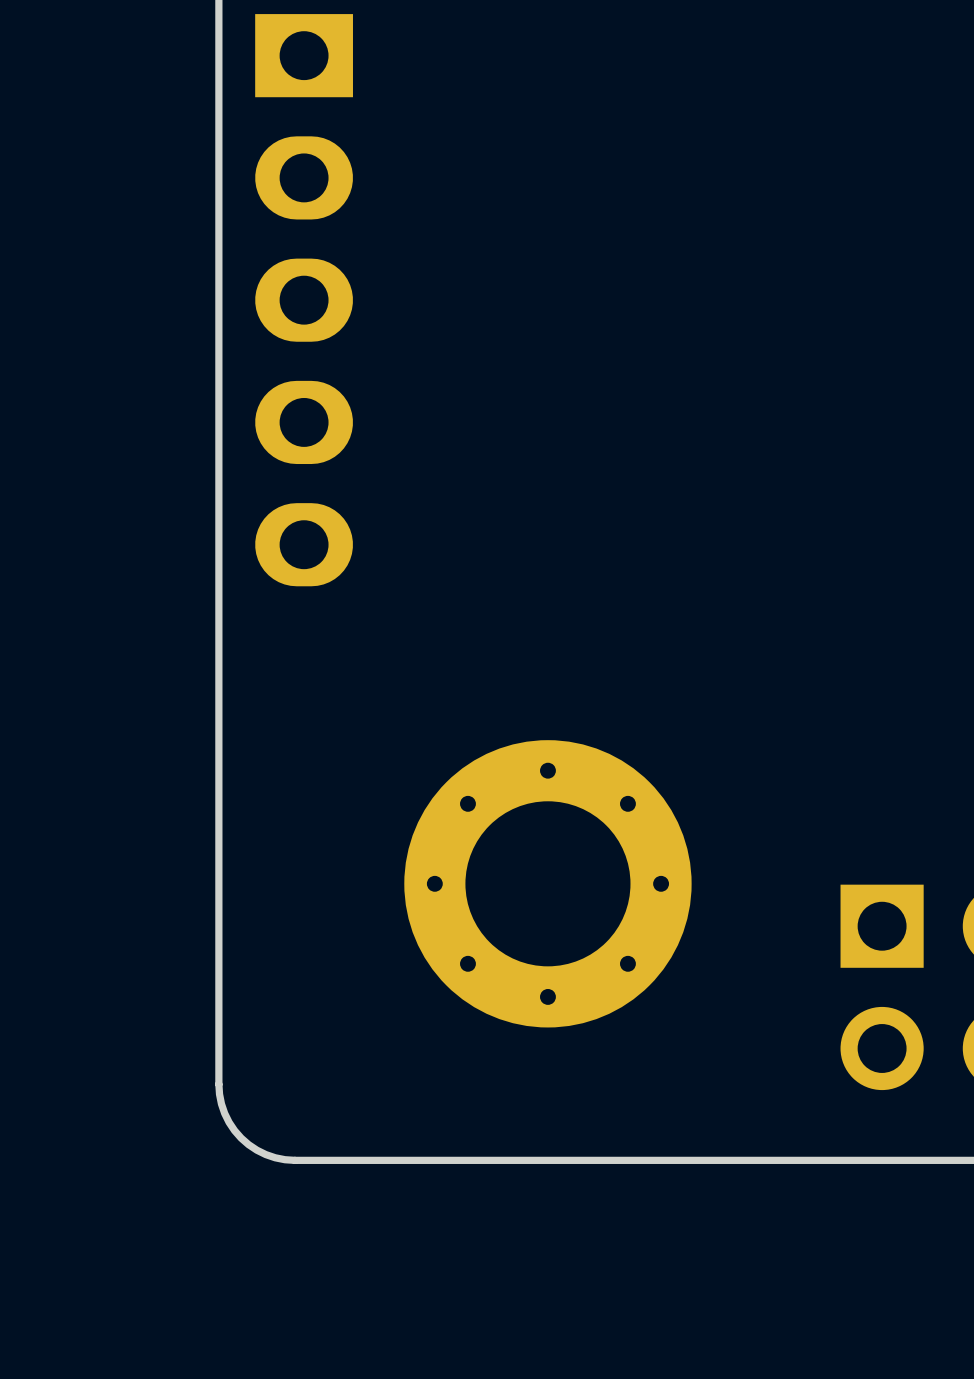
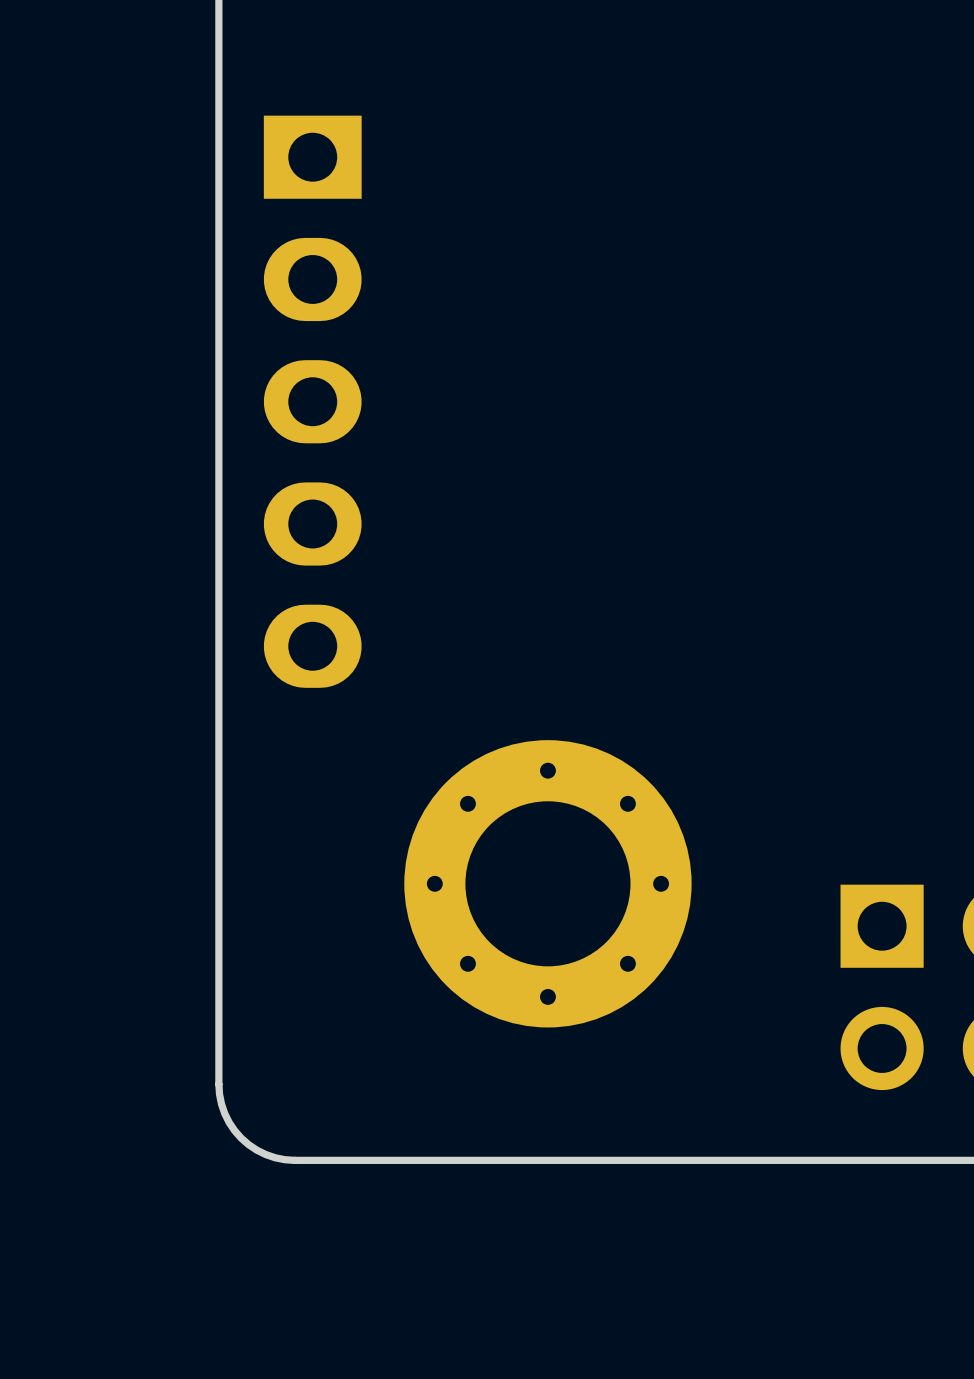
part position: (304, 300) -> (312, 401)

